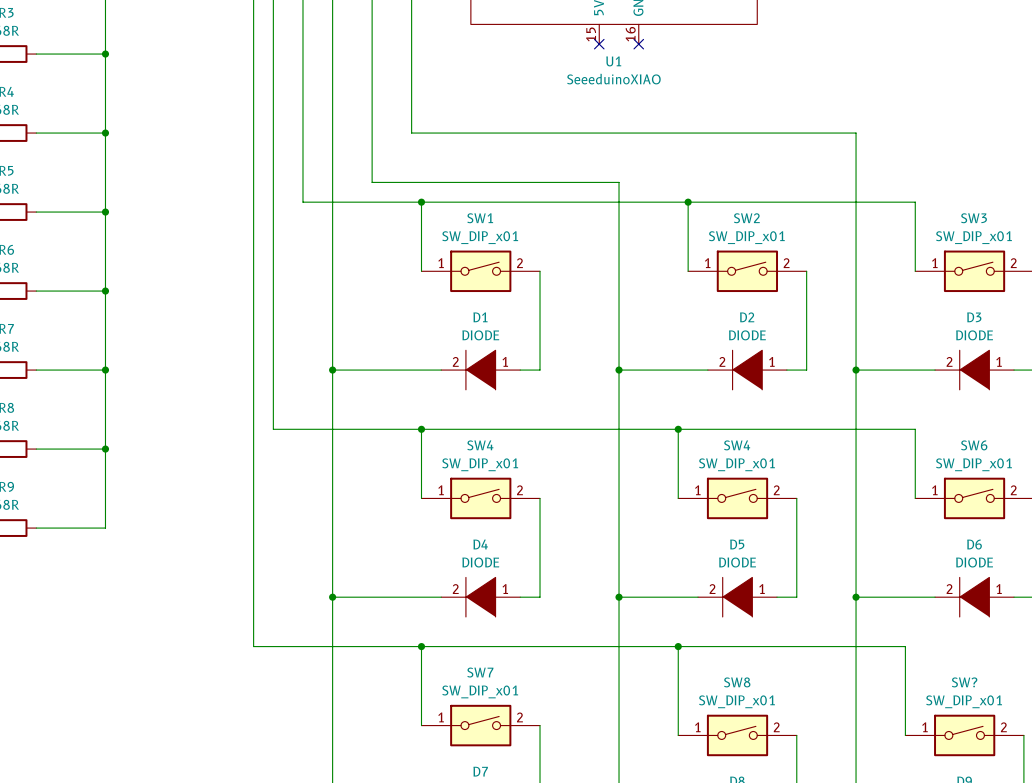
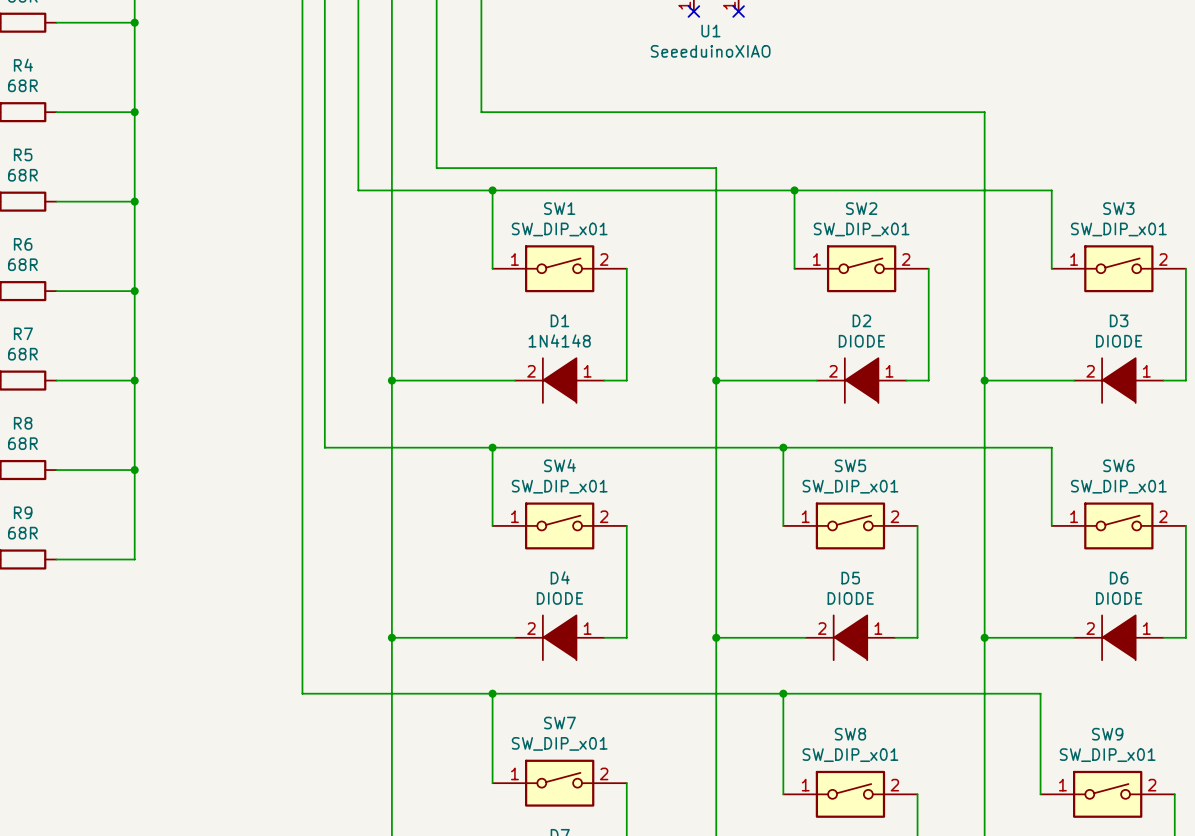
D1 value: DIODE (480, 335) -> 1N4148 (559, 340)
SW4 name: SW4 (737, 445) -> SW5 (850, 465)
SW? name: SW? (964, 682) -> SW9 (1107, 734)

